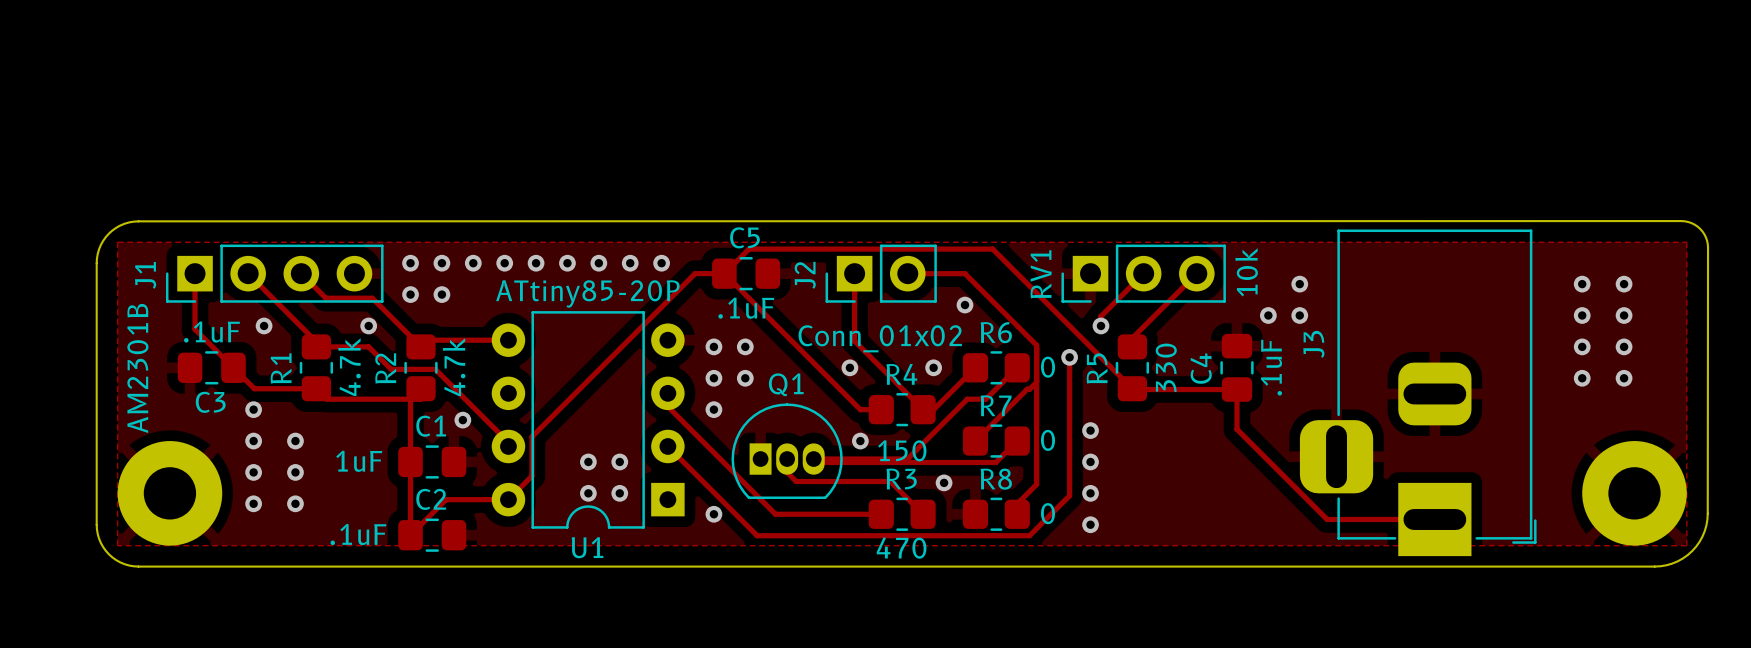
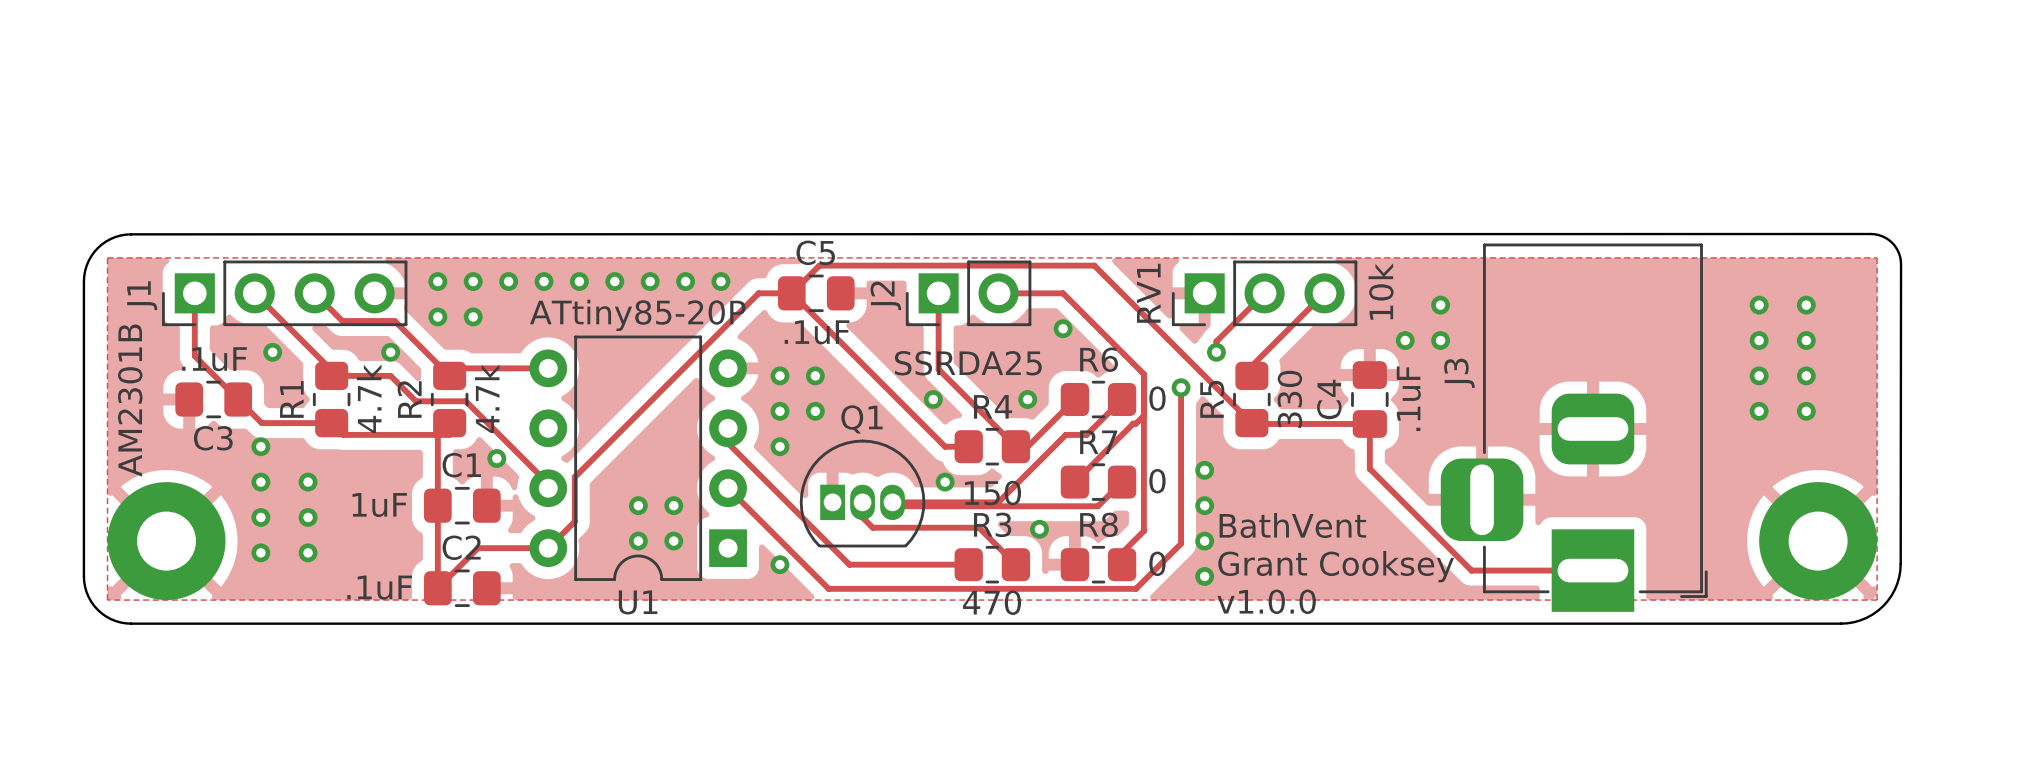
J2 value: Conn_01x02 (880, 338) -> SSRDA25 (968, 363)
text: none -> BathVent (1292, 525)
text: none -> Grant Cooksey (1336, 566)
text: none -> v1.0.0 (1266, 601)

